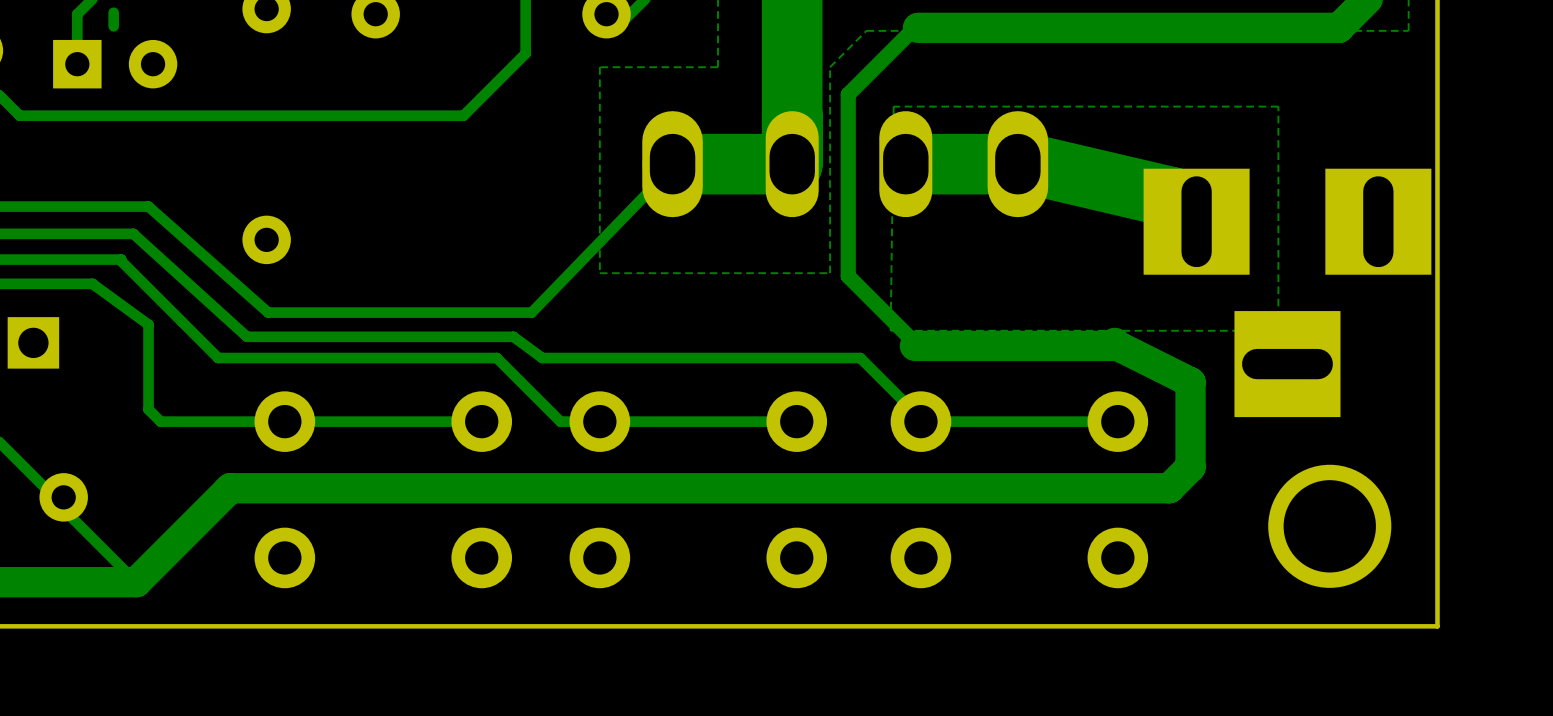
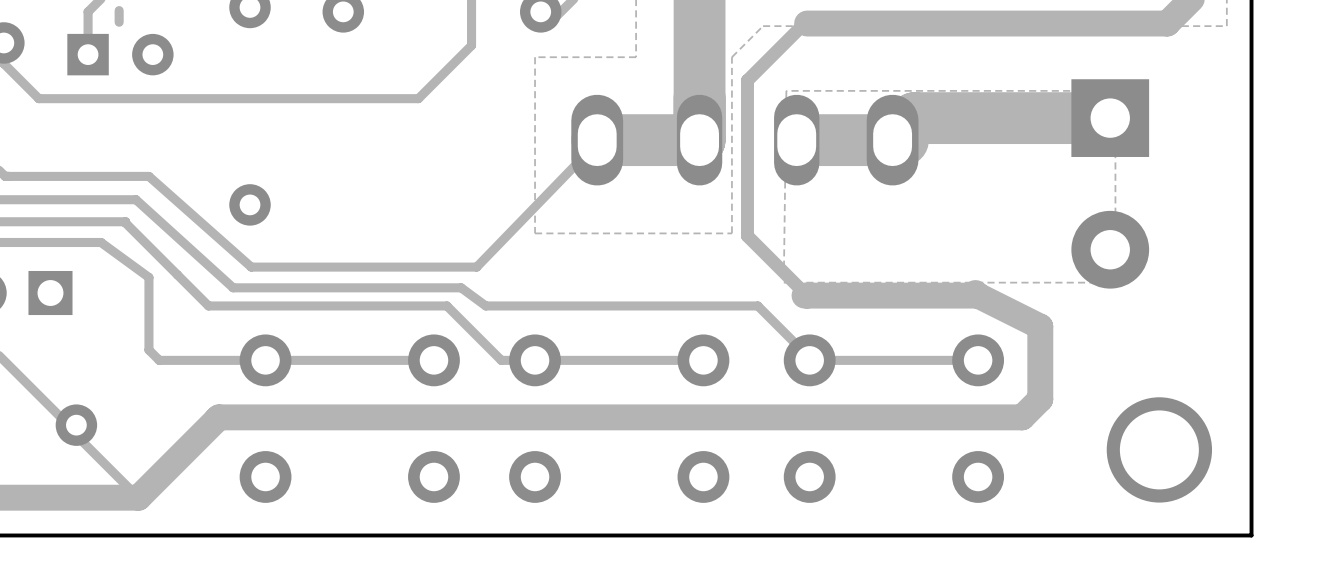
track: none -> (1110, 118) (914, 118) (892, 140)
track: (1030, 164) (1172, 197) (1196, 221) -> none
part: none -> (1110, 183)
part: (1287, 292) -> none

